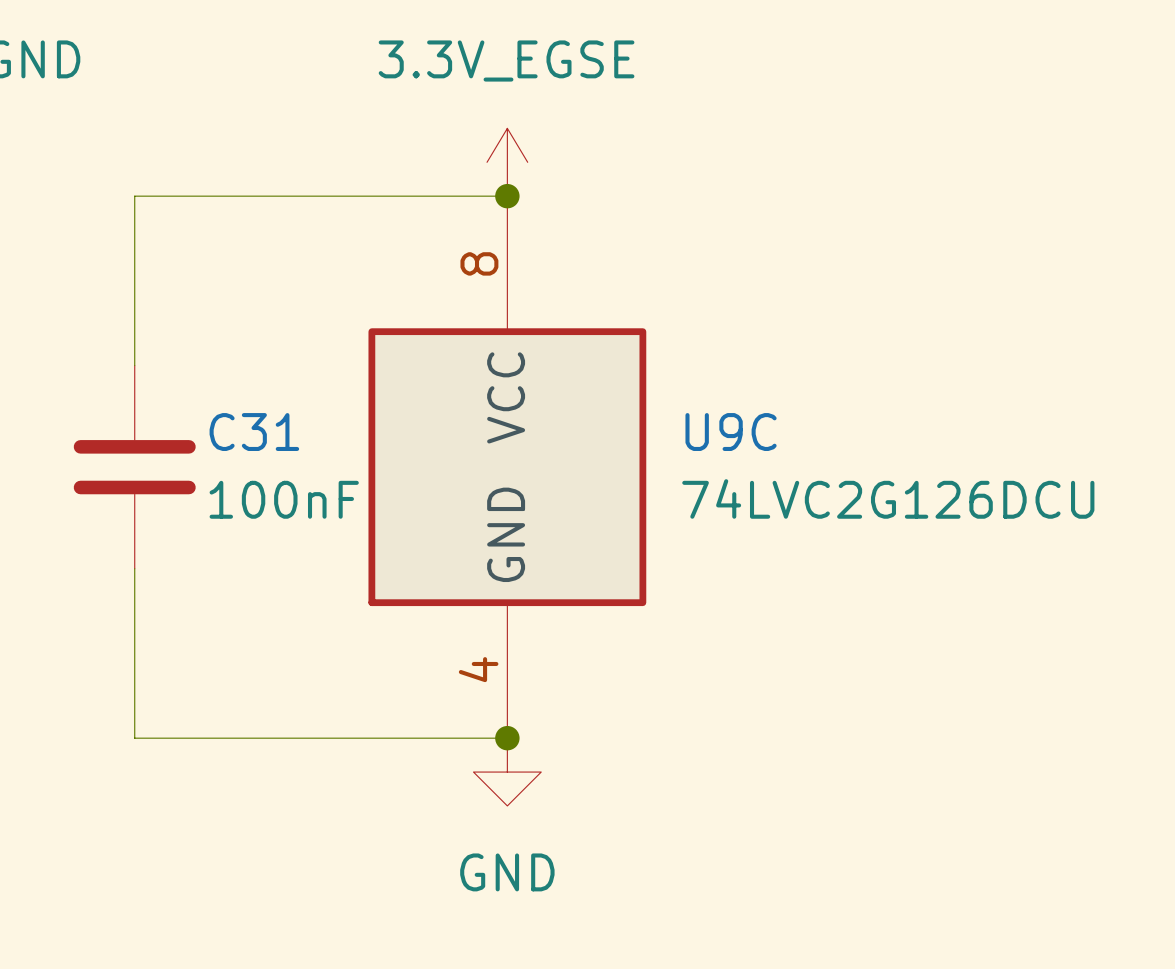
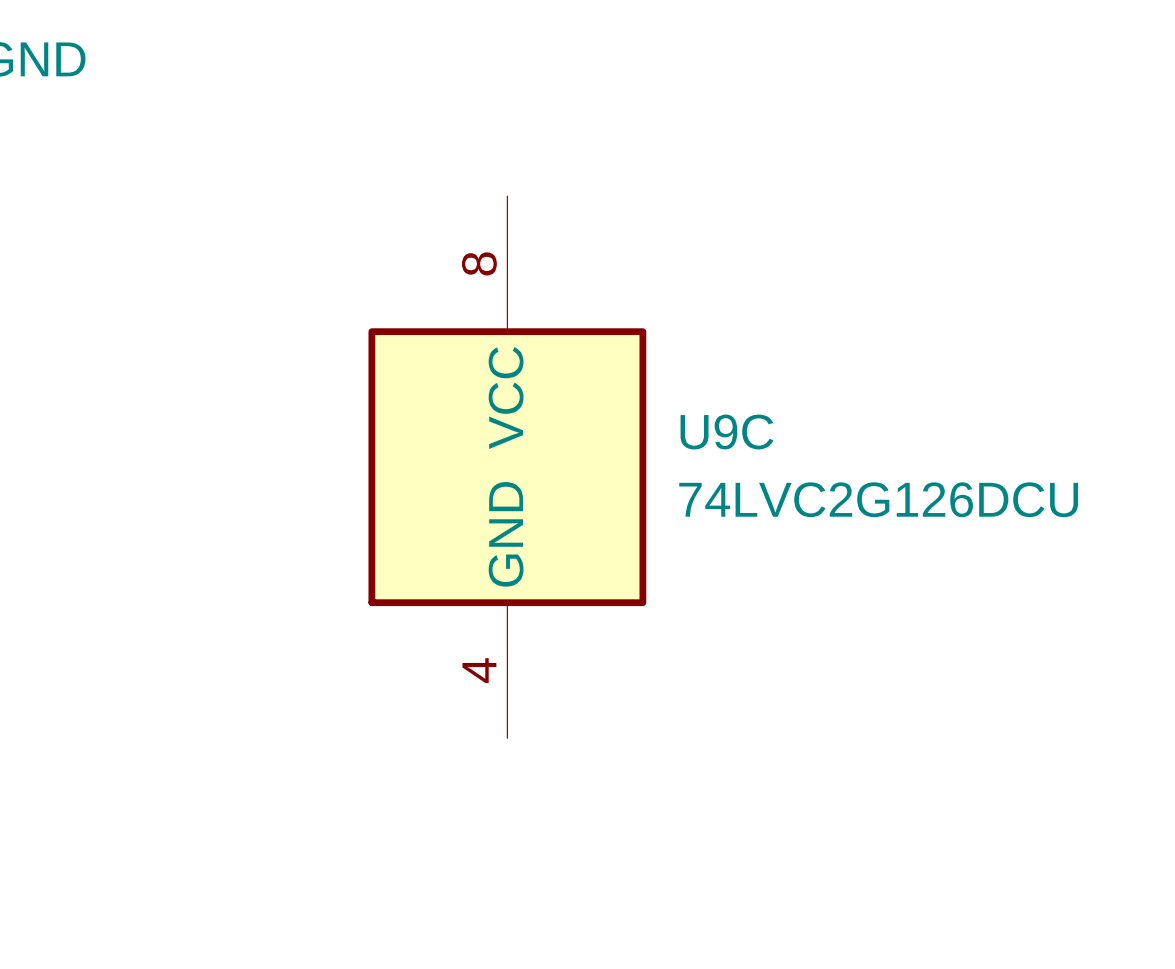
power symbol: 3.3V_EGSE (507, 162) -> none
wire: (507, 196) (134, 196) (134, 365) -> none
junction: (507, 196) -> none
C31: 100nF (134, 467) -> none
wire: (134, 568) (134, 738) (507, 738) -> none
junction: (507, 738) -> none
power symbol: GND (507, 772) -> none

